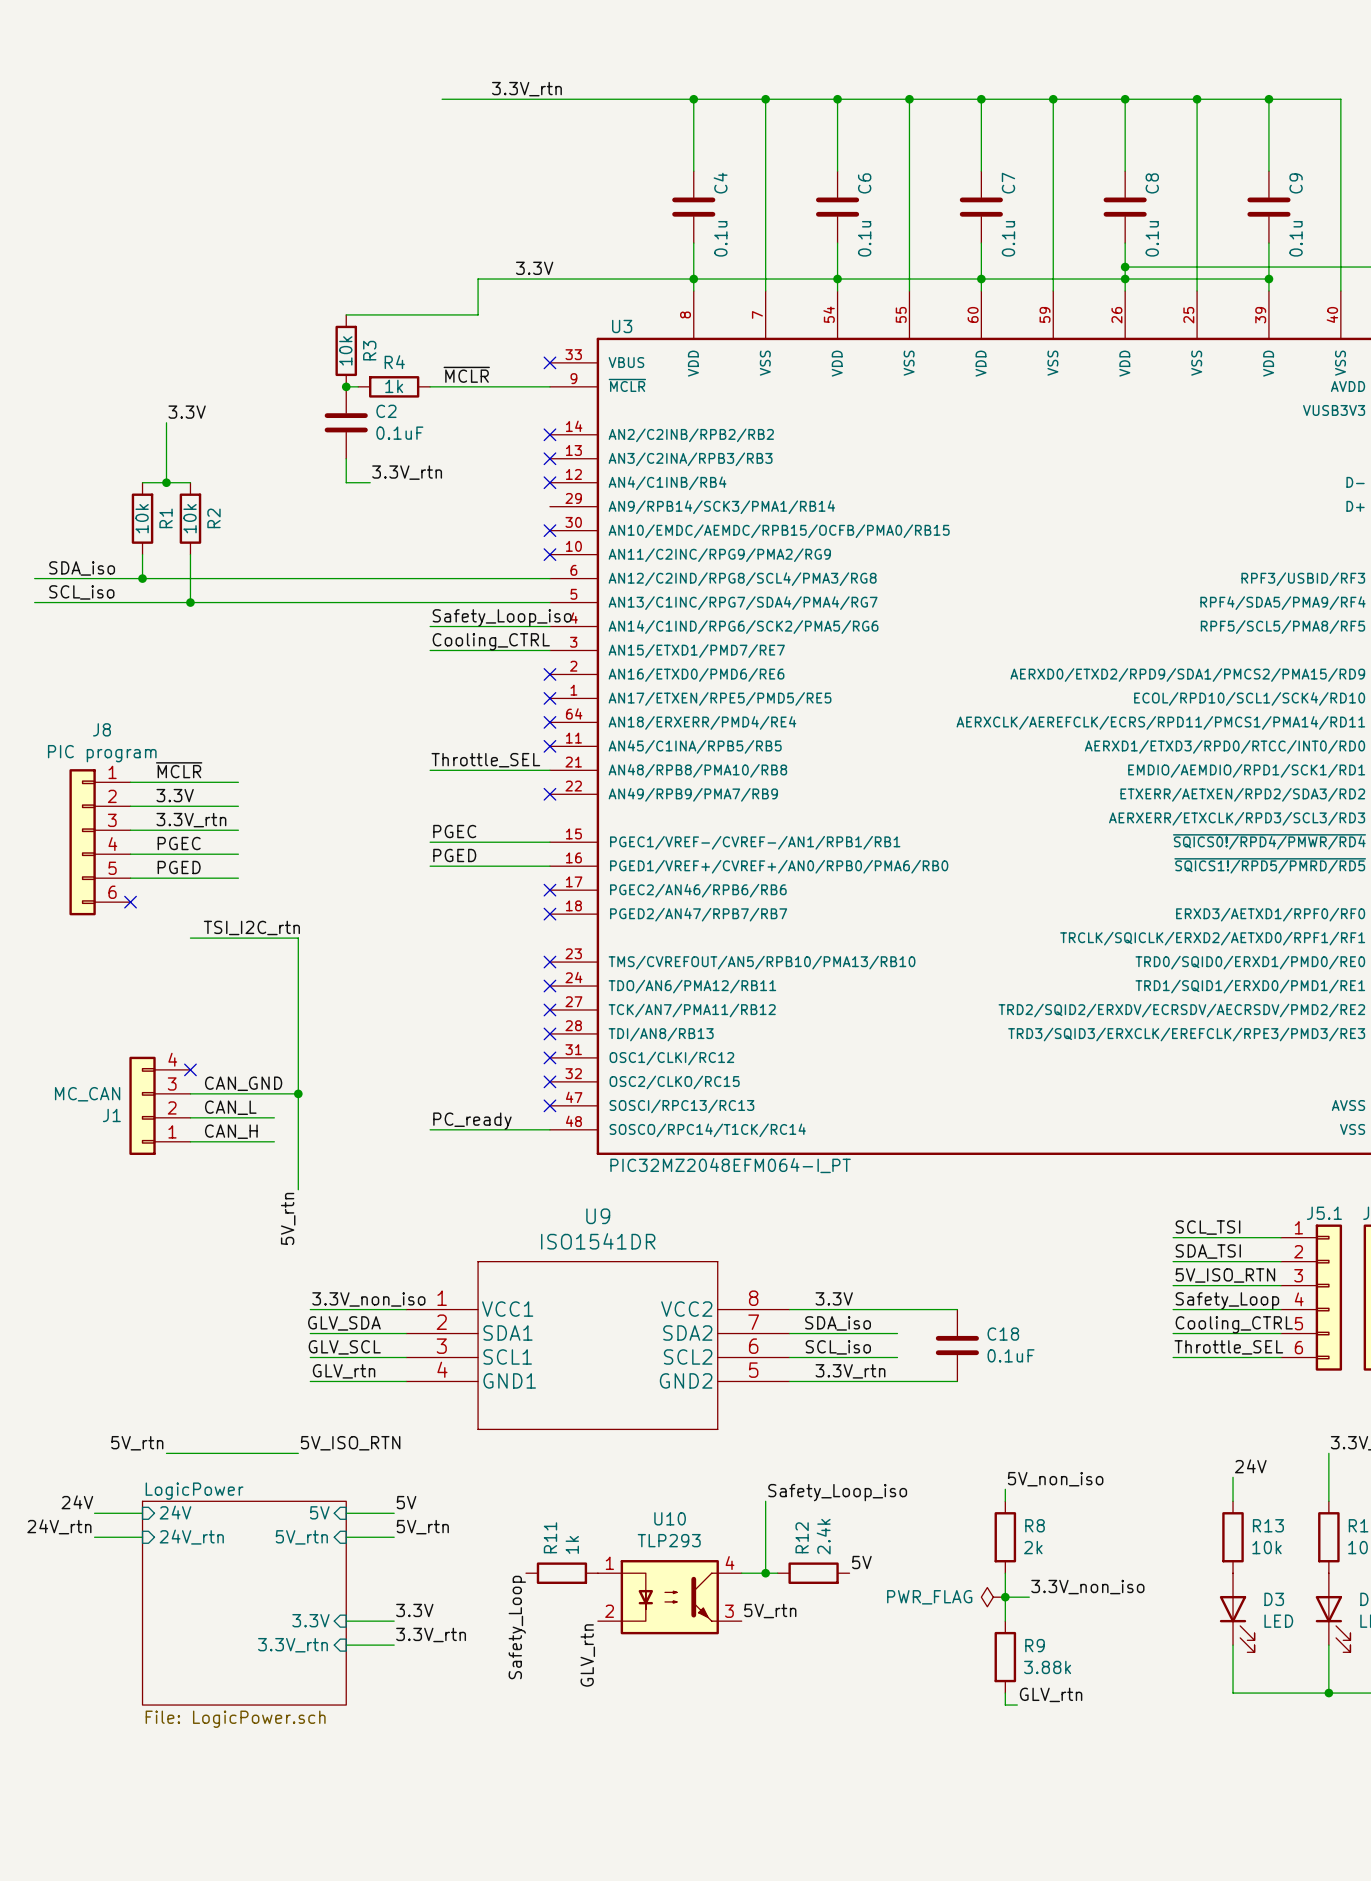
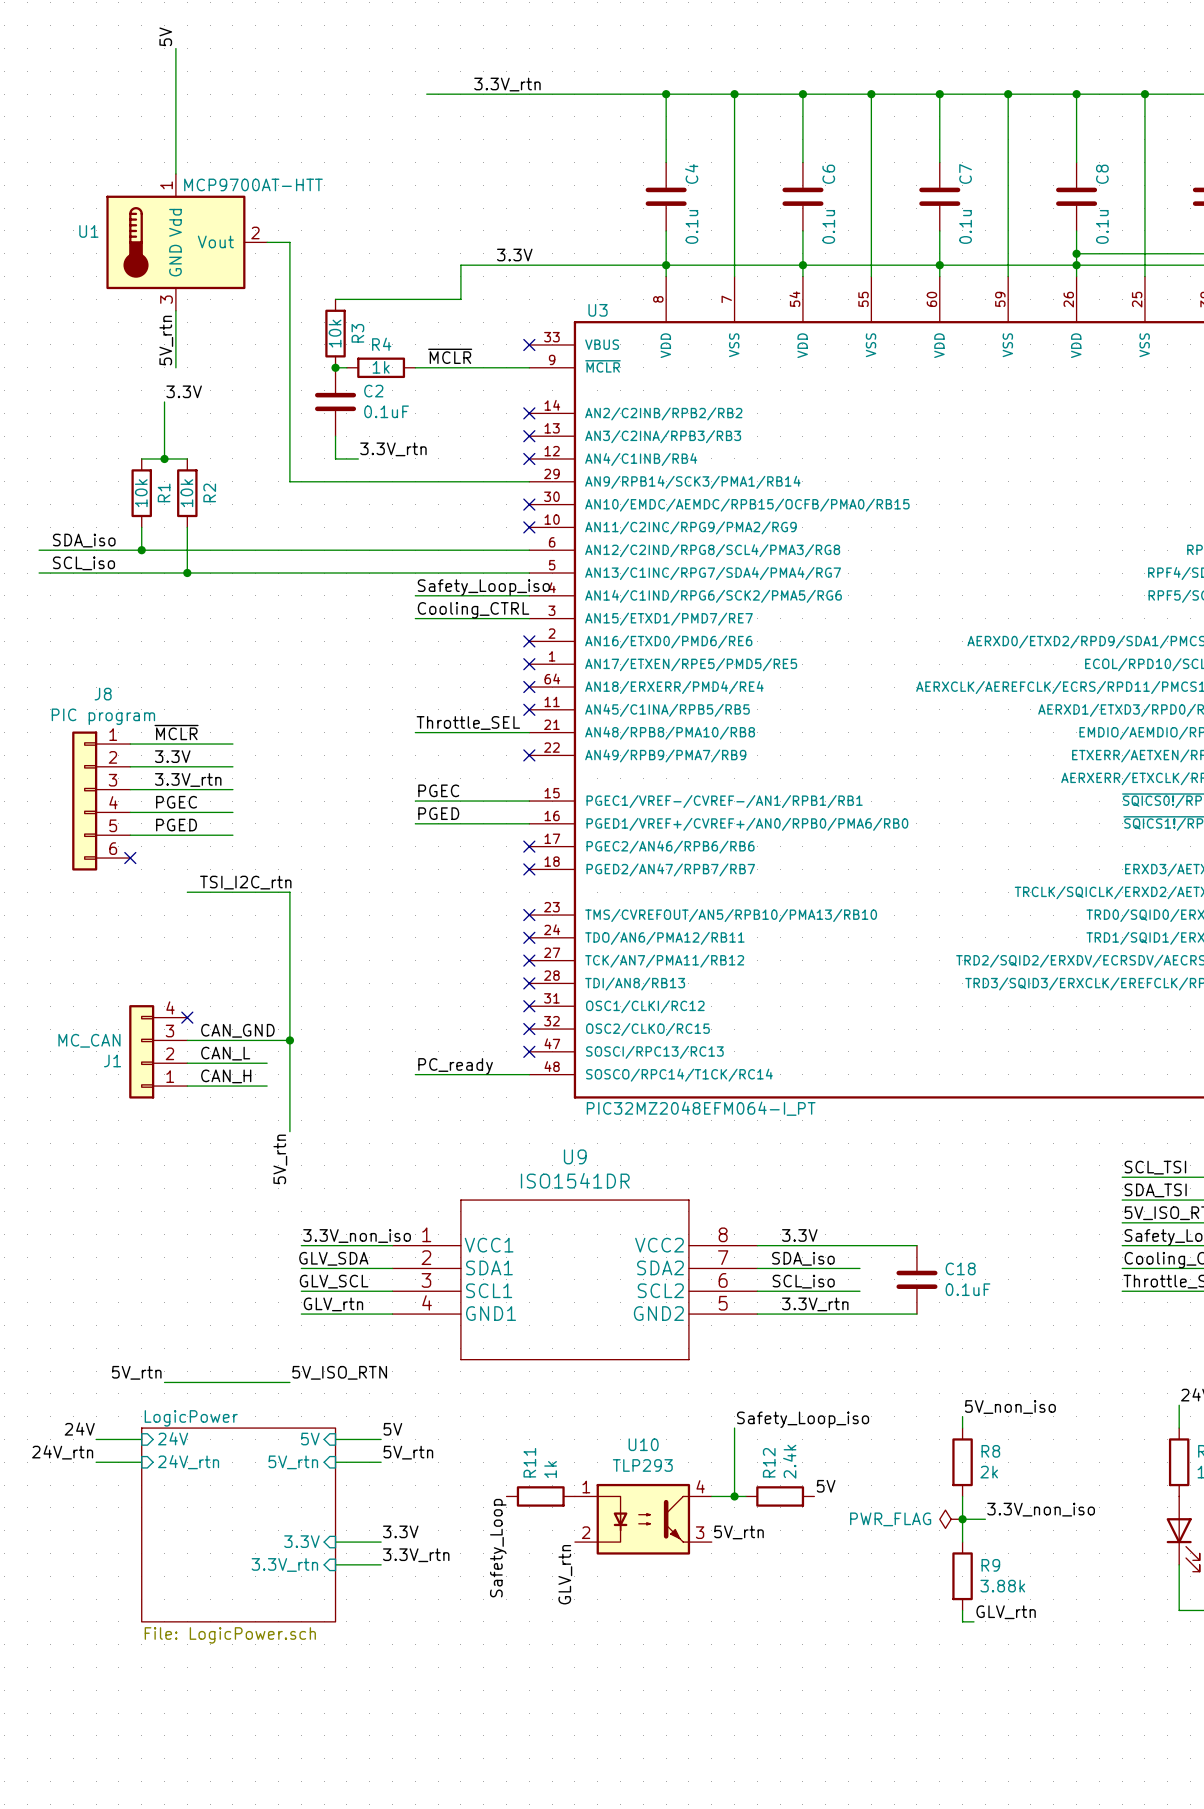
label: none -> 5V (165, 36)
wire: none -> (175, 48) (175, 173)
U1: none -> MCP9700AT-HTT (186, 242)
wire: none -> (267, 242) (289, 242) (289, 481) (529, 481)
wire: none -> (175, 310) (175, 367)
label: none -> 5V_rtn (166, 340)

